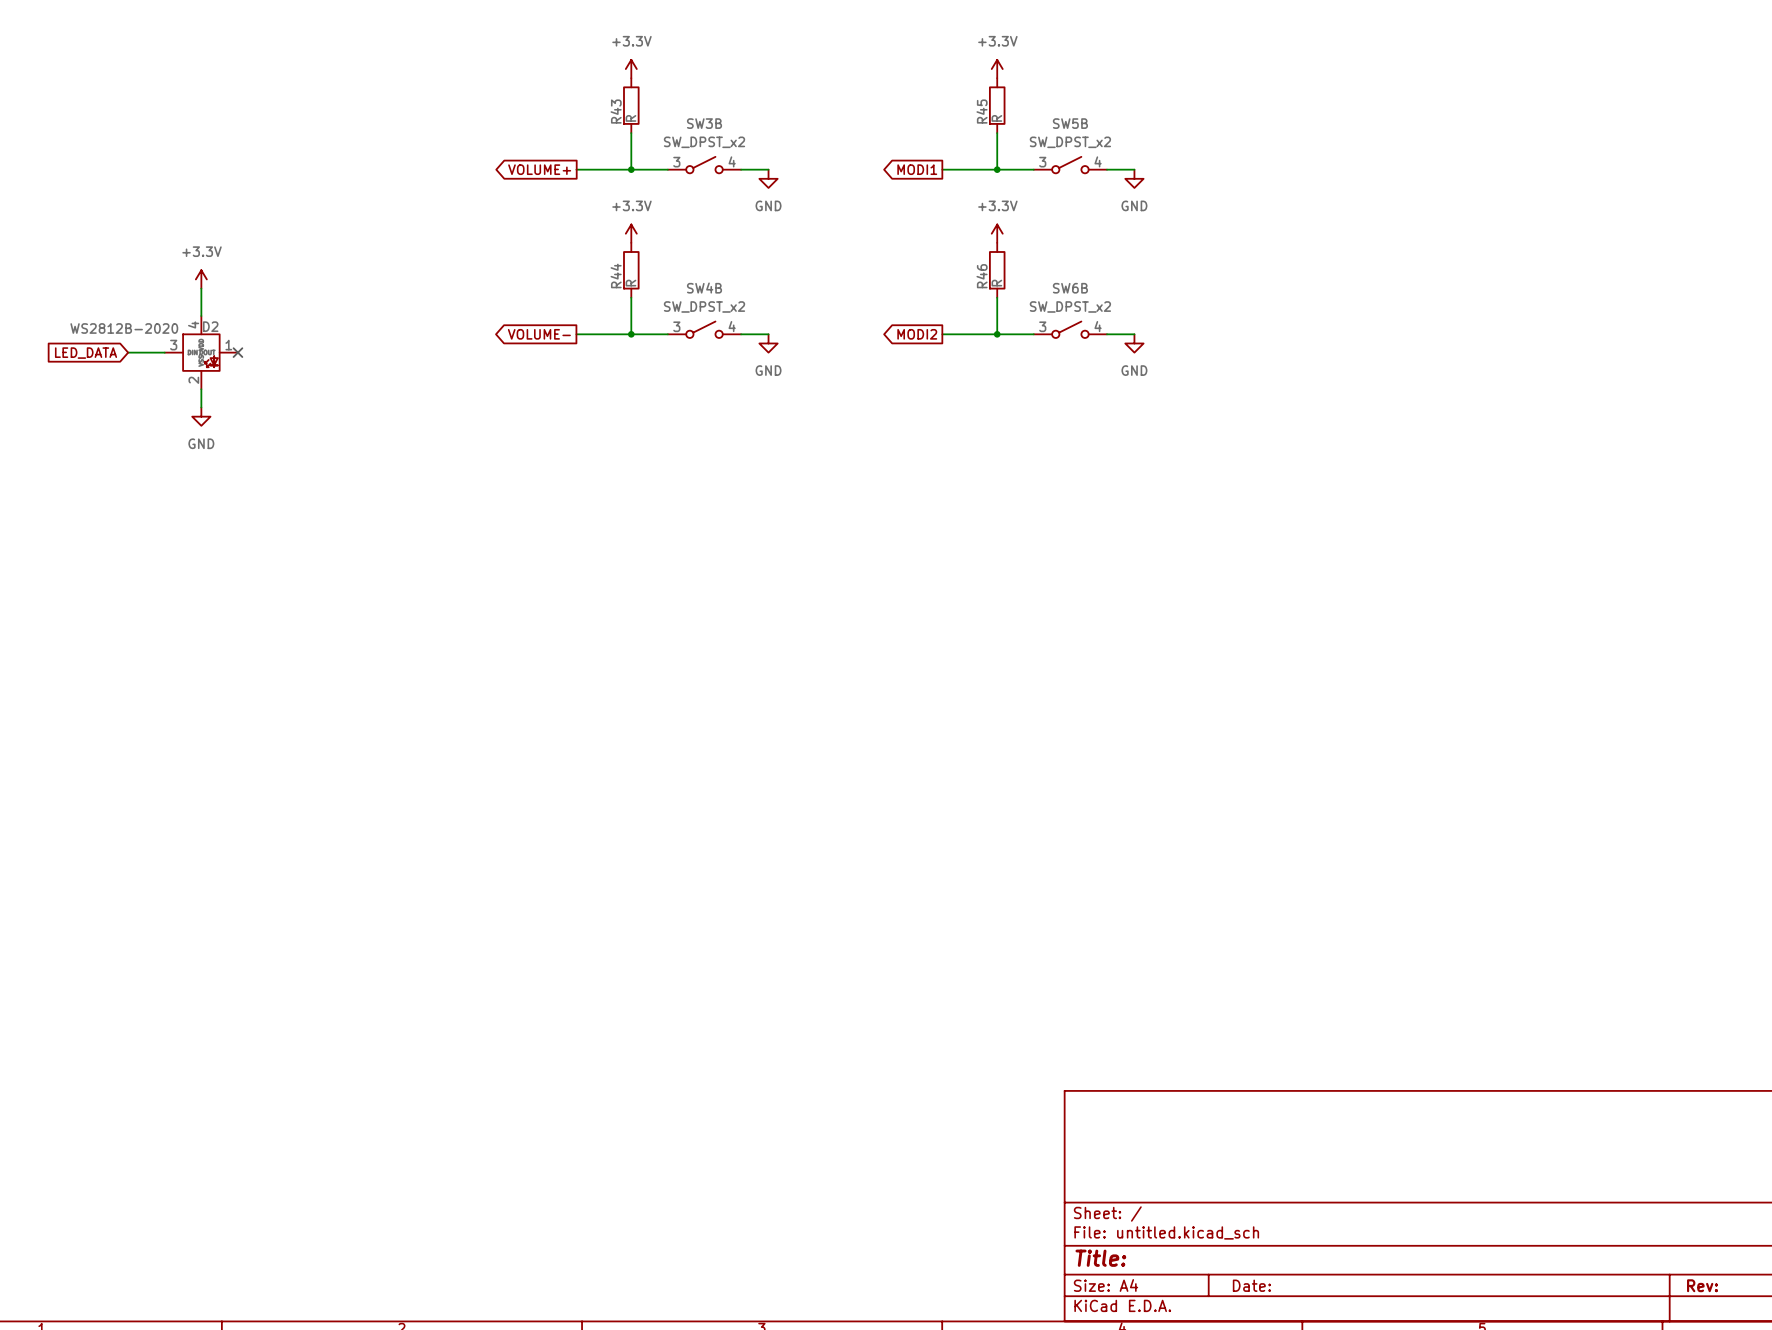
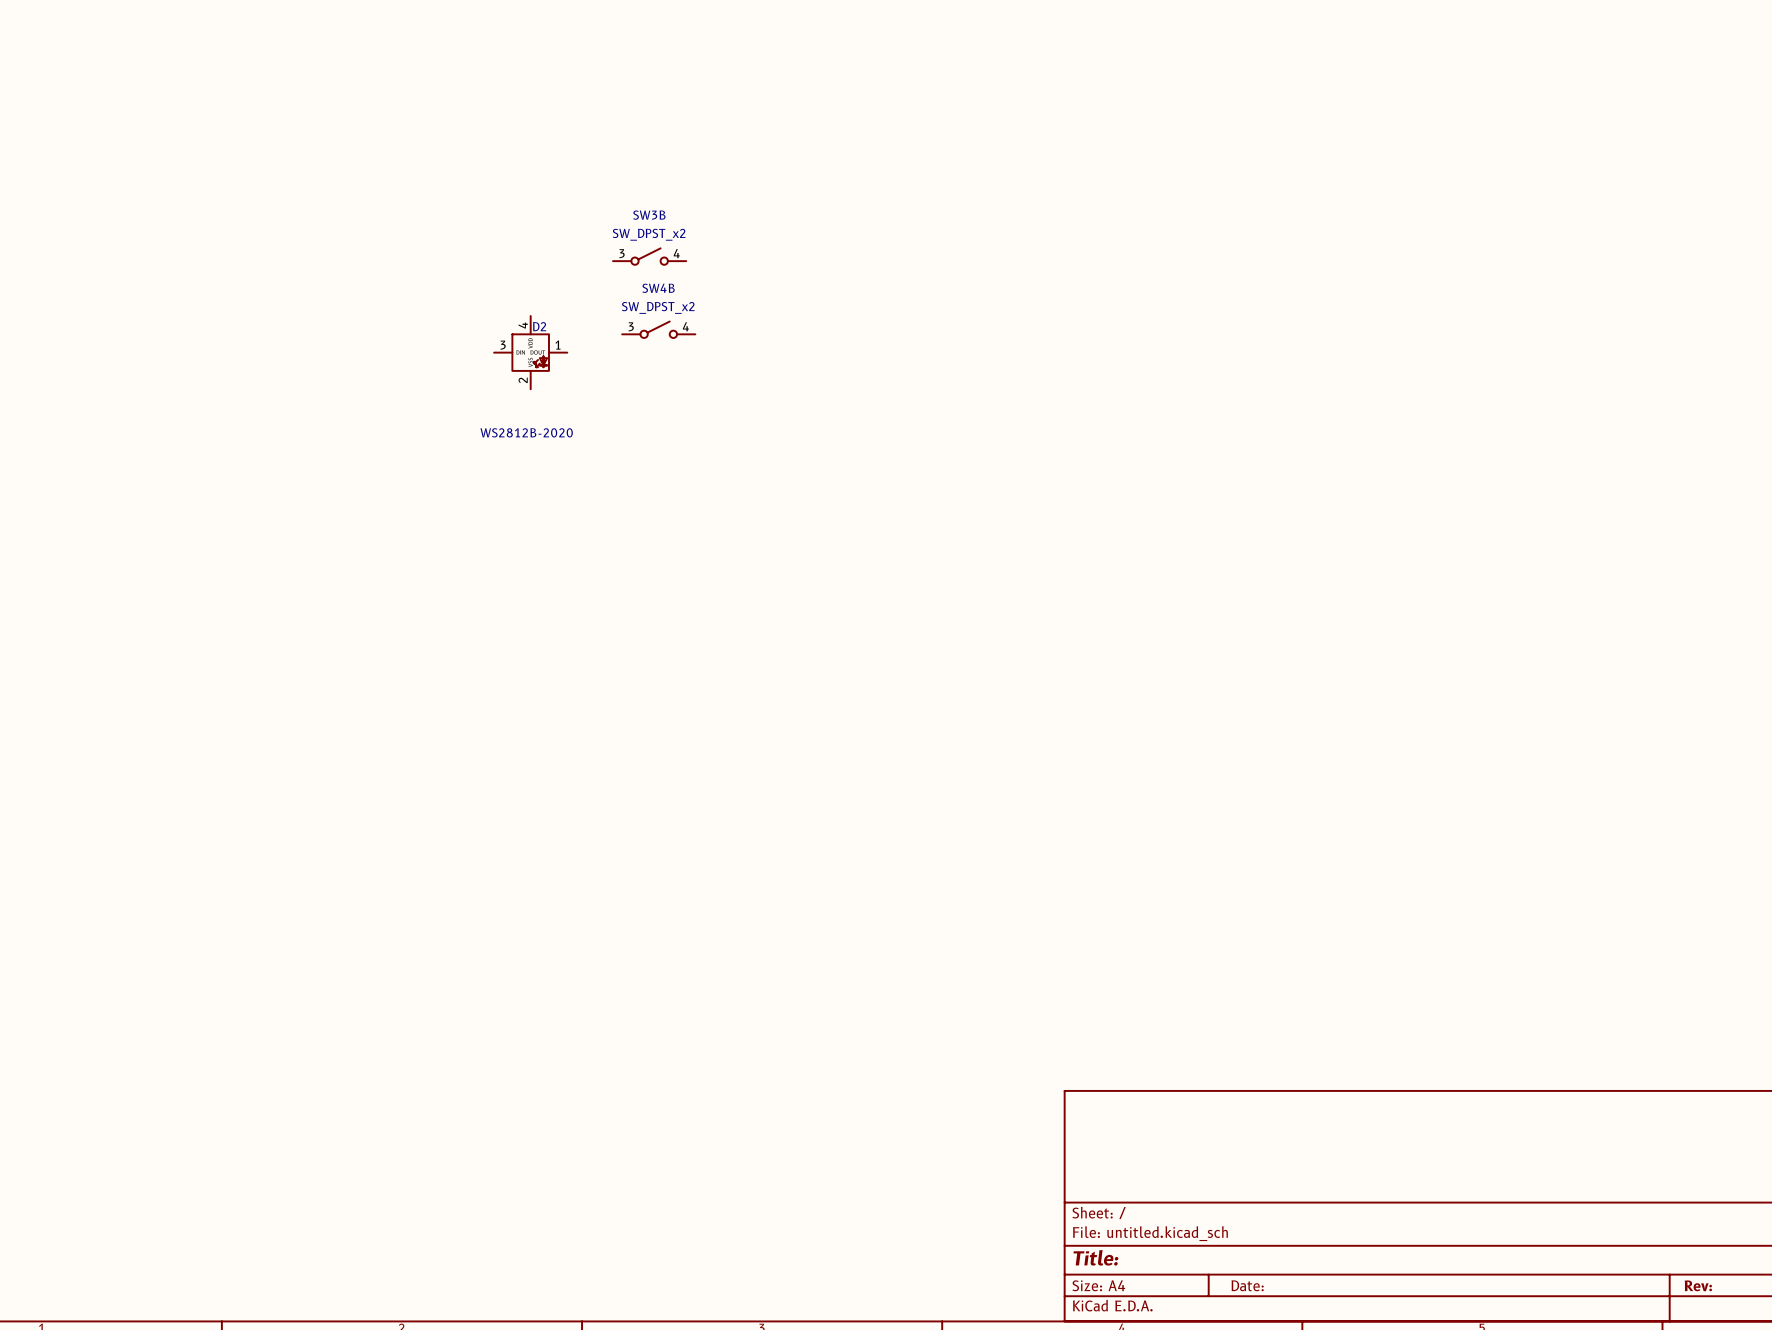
power symbol: +3.3V (631, 69) -> none
power symbol: +3.3V (997, 69) -> none
R43: R (631, 105) -> none
R45: R (997, 105) -> none
wire: (631, 133) (631, 169) -> none
wire: (997, 133) (997, 169) -> none
SW3B position: (704, 165) -> (649, 256)
SW5B: SW_DPST_x2 (1070, 165) -> none
global label: VOLUME+ (539, 169) -> none
wire: (576, 169) (667, 169) -> none
junction: (631, 169) -> none
wire: (741, 169) (768, 169) -> none
global label: MODI1 (917, 169) -> none
wire: (942, 169) (1033, 169) -> none
junction: (997, 169) -> none
wire: (1107, 169) (1134, 169) -> none
power symbol: GND (768, 178) -> none
power symbol: GND (1134, 178) -> none
power symbol: +3.3V (631, 233) -> none
power symbol: +3.3V (997, 233) -> none
R44: R (631, 270) -> none
R46: R (997, 270) -> none
power symbol: +3.3V (201, 279) -> none
wire: (201, 288) (201, 316) -> none
wire: (631, 297) (631, 334) -> none
wire: (997, 297) (997, 334) -> none
D2 value position: WS2812B-2020 (124, 328) -> WS2812B-2020 (526, 432)
SW4B position: (704, 329) -> (658, 329)
SW6B: SW_DPST_x2 (1070, 329) -> none
global label: VOLUME- (539, 334) -> none
wire: (576, 334) (667, 334) -> none
junction: (631, 334) -> none
wire: (741, 334) (768, 334) -> none
global label: MODI2 (917, 334) -> none
wire: (942, 334) (1033, 334) -> none
junction: (997, 334) -> none
wire: (1107, 334) (1134, 334) -> none
power symbol: GND (768, 343) -> none
power symbol: GND (1134, 343) -> none
wire: (128, 352) (164, 352) -> none
D2 position: (201, 352) -> (530, 352)
no-connect mark: (237, 352) -> none
global label: LED_DATA (86, 353) -> none
wire: (201, 389) (201, 407) -> none
power symbol: GND (201, 416) -> none

